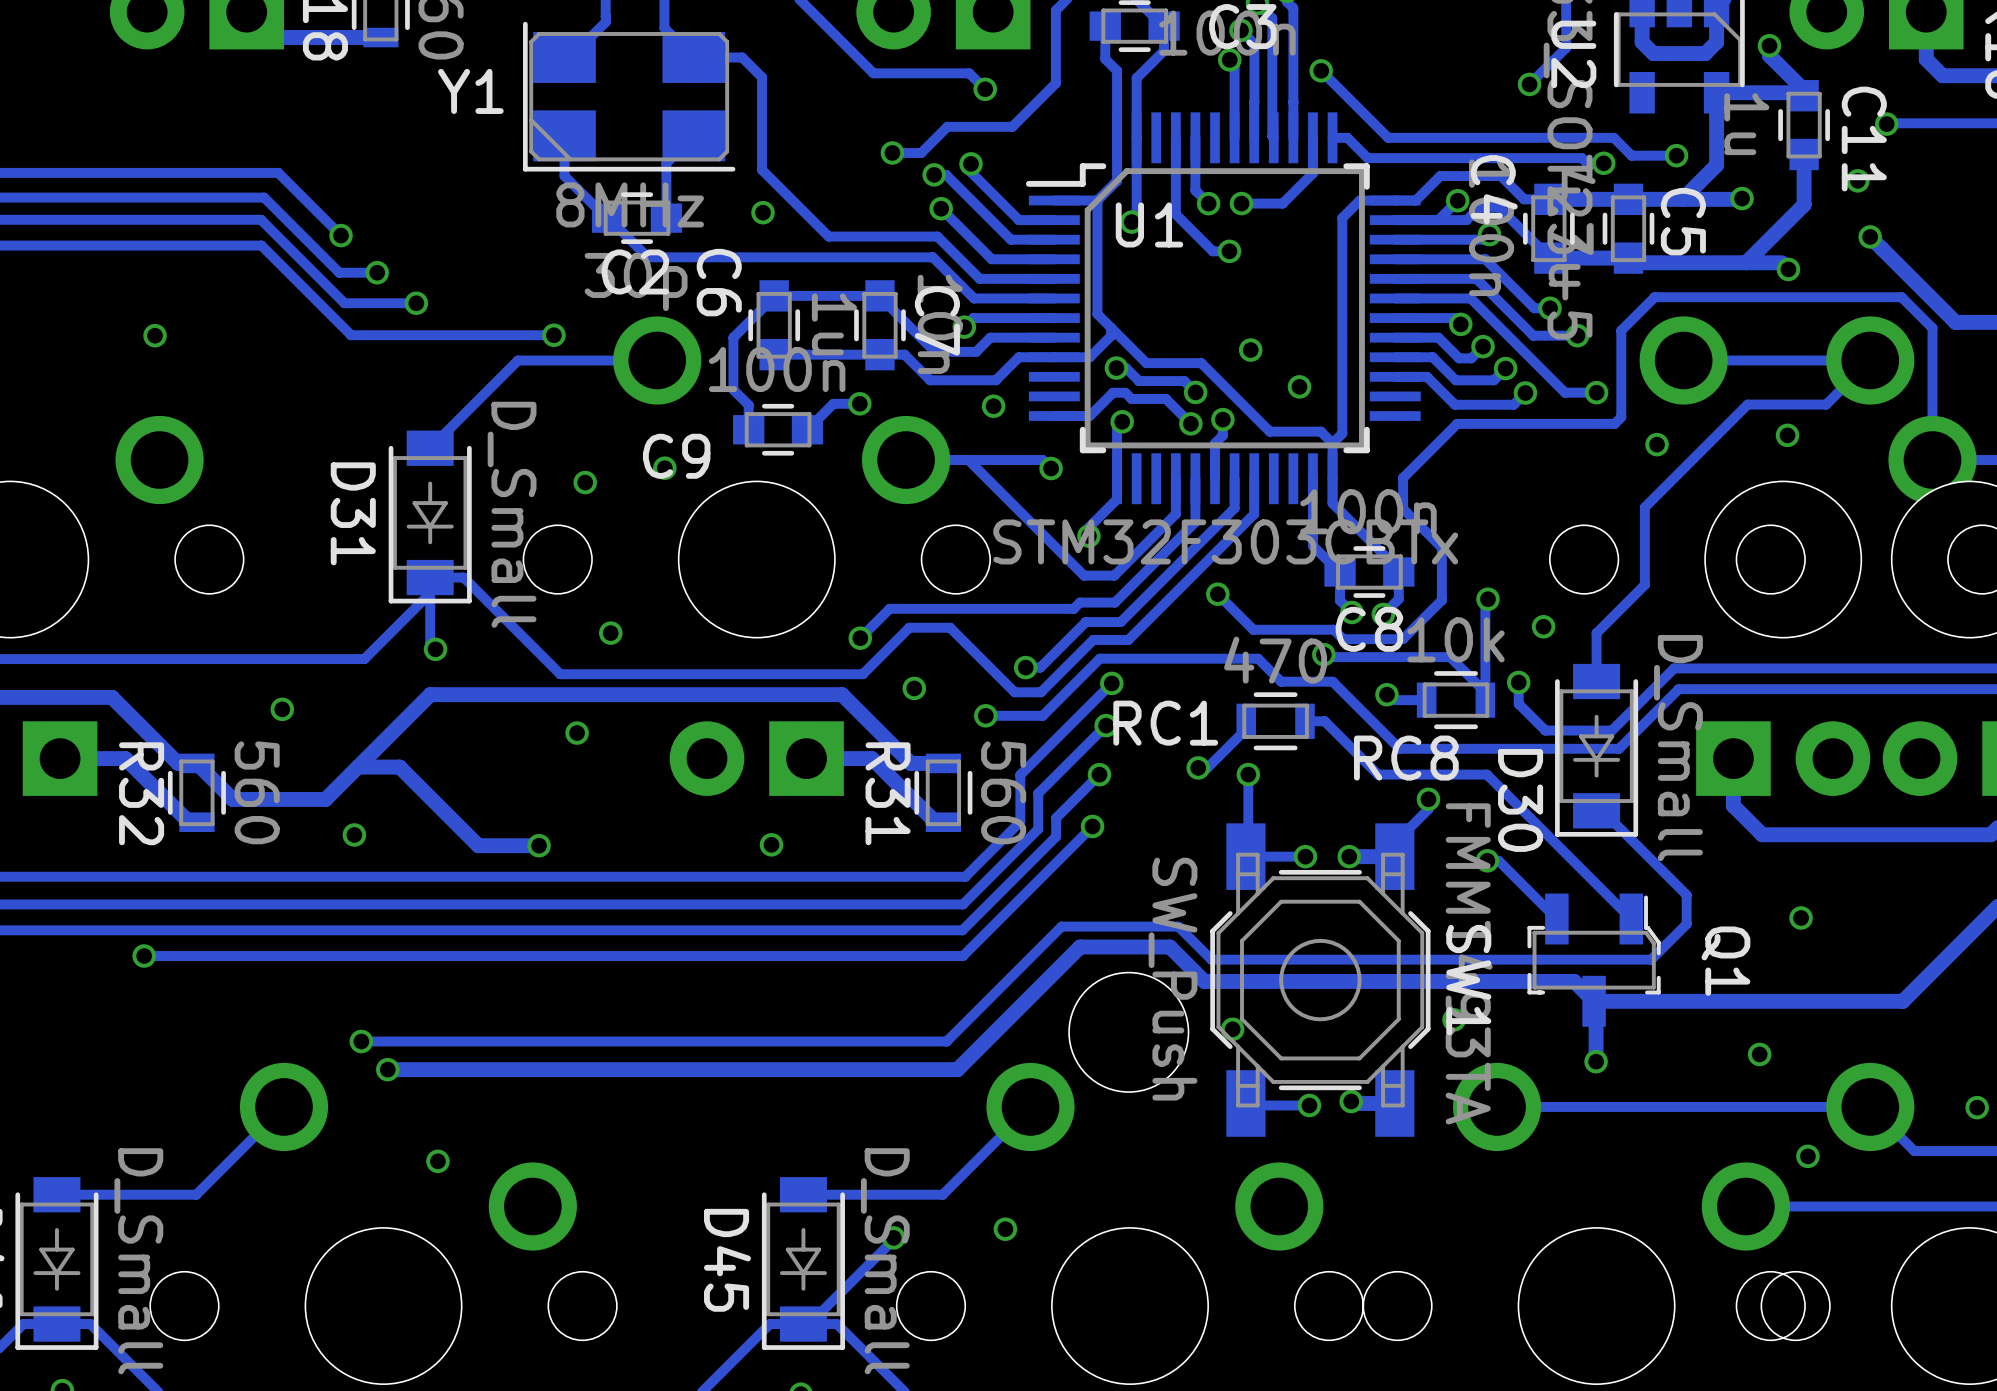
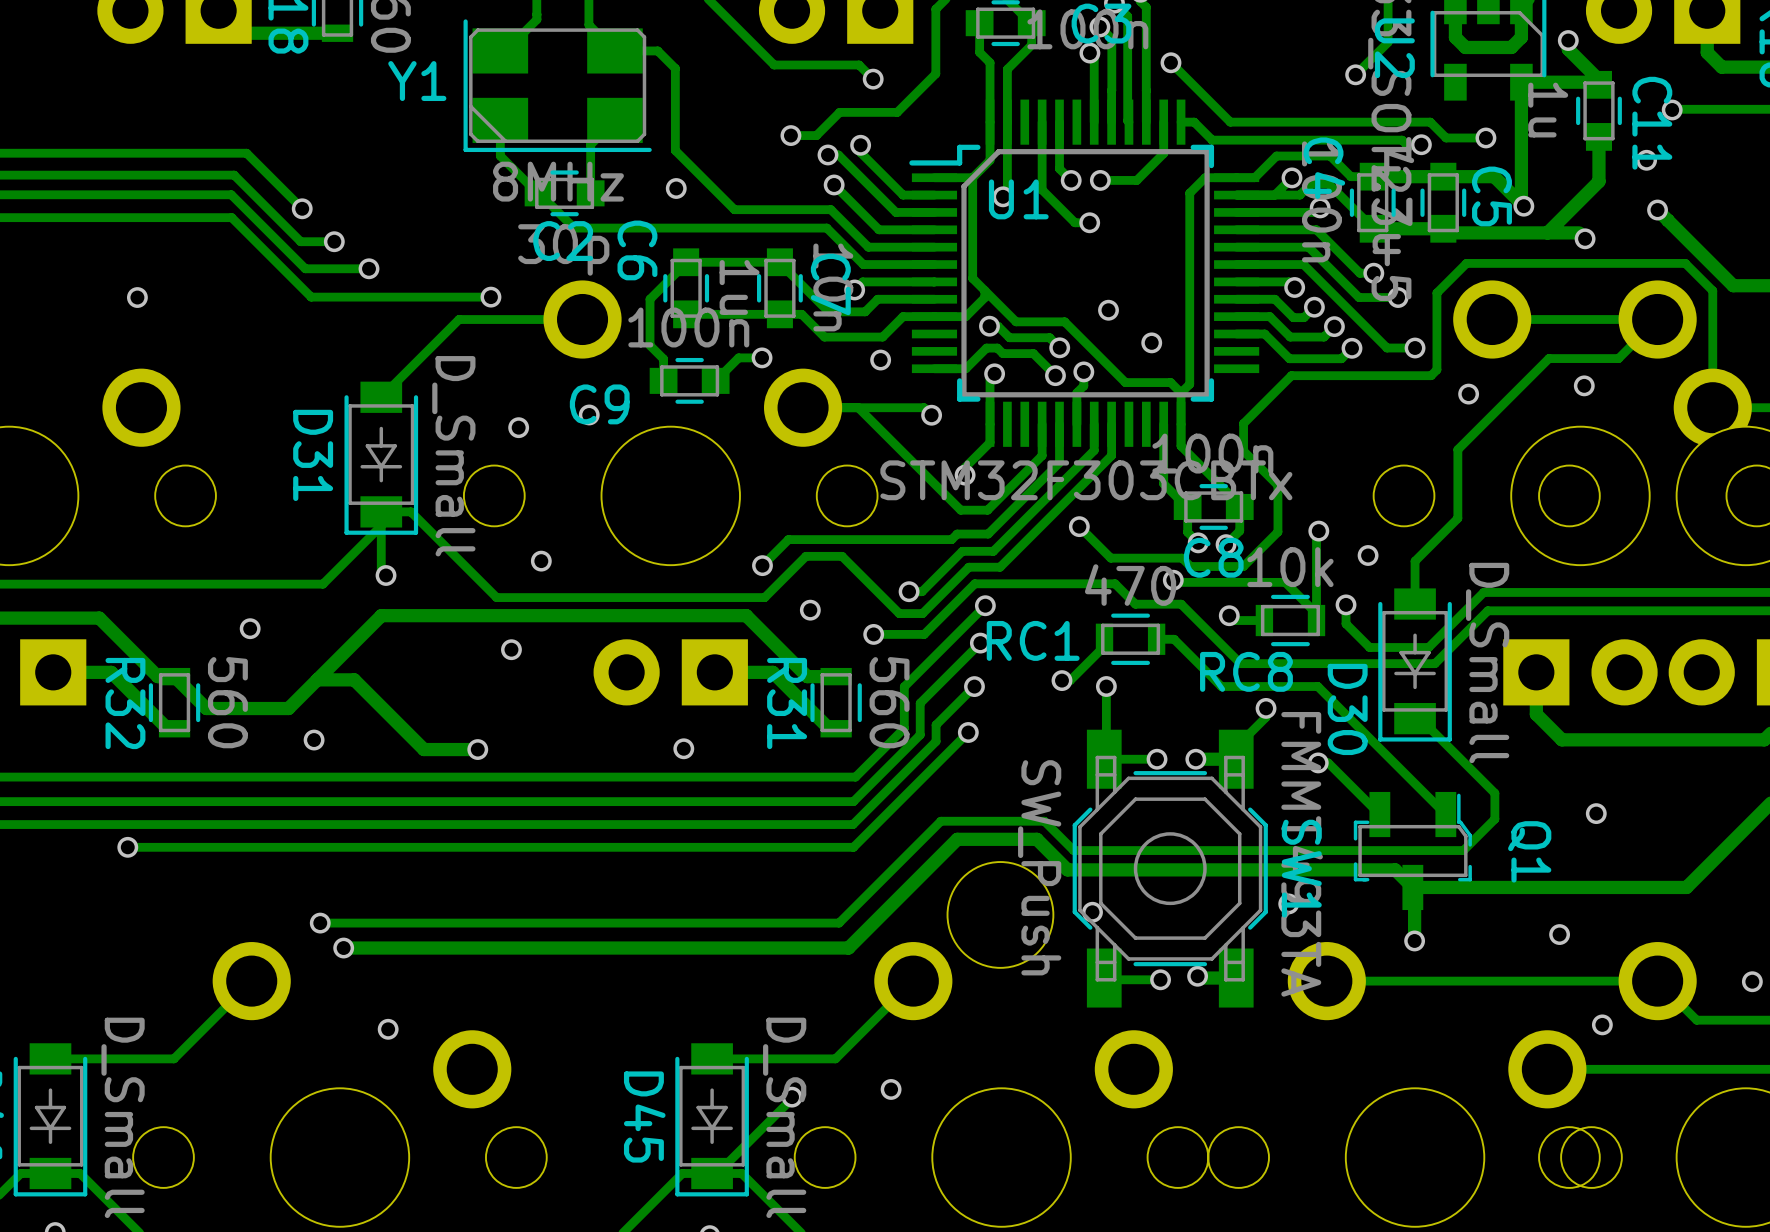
track: (1716, 165) (1682, 199) -> (1521, 146) (1521, 203) (1523, 206) (1494, 176)
track: (1742, 198) (1686, 199) -> none
via position: (1742, 198) -> (1523, 206)

